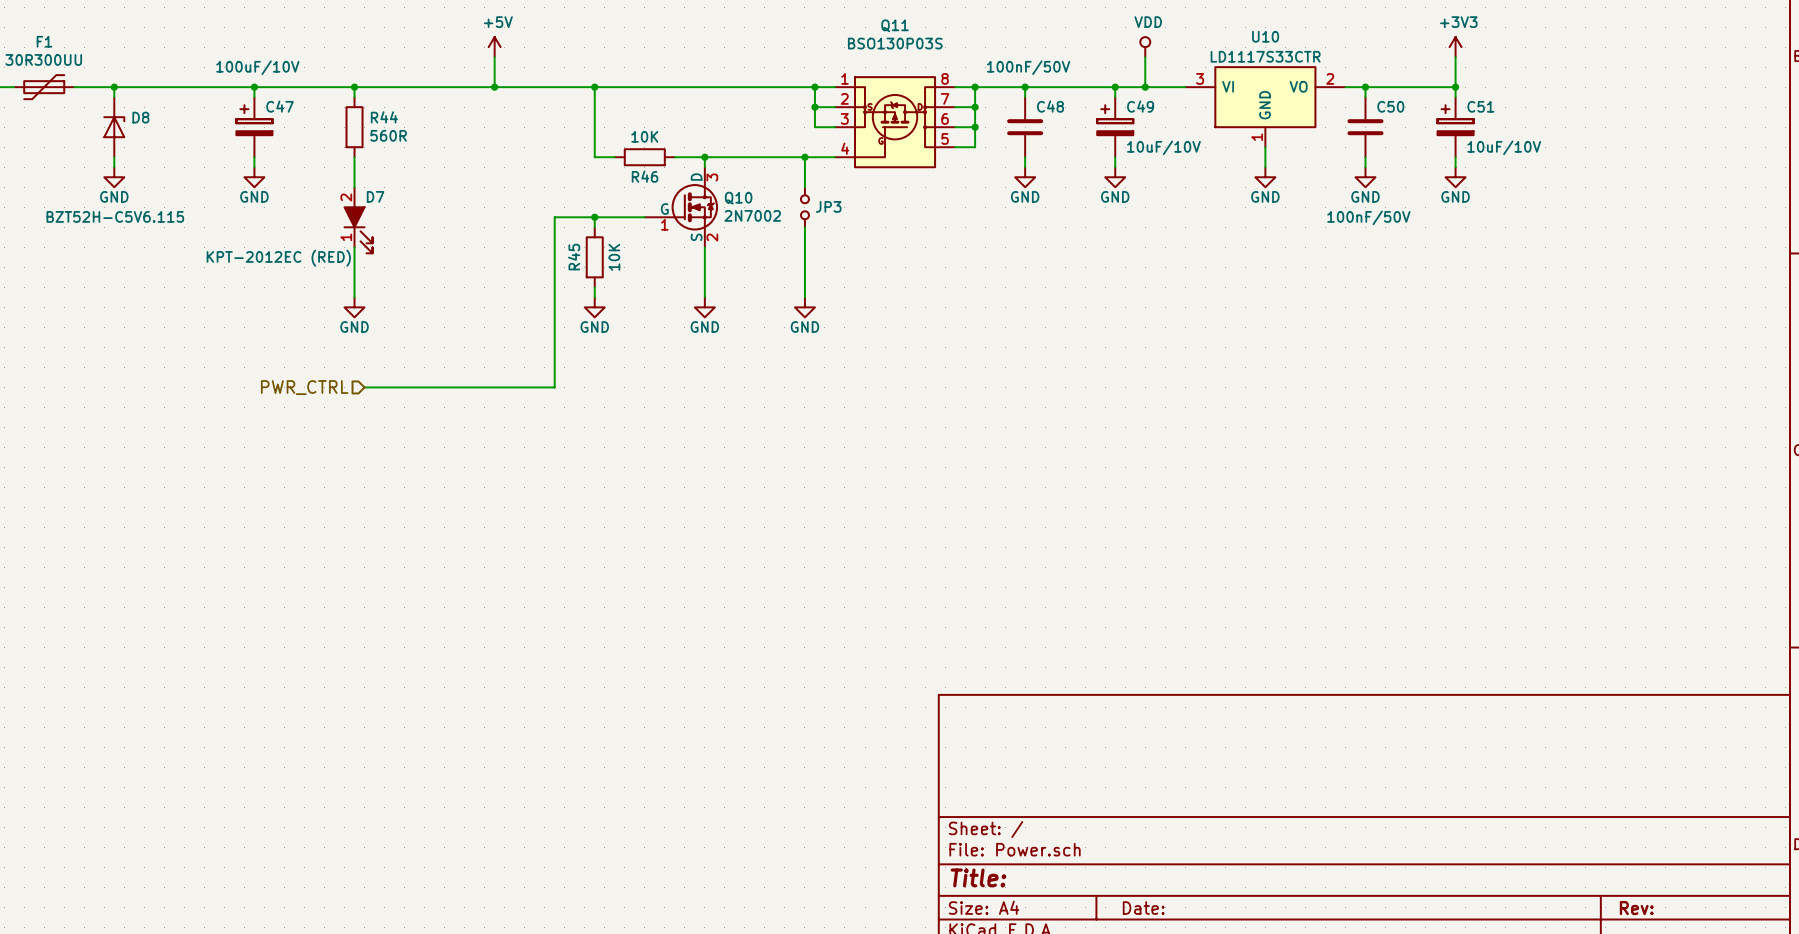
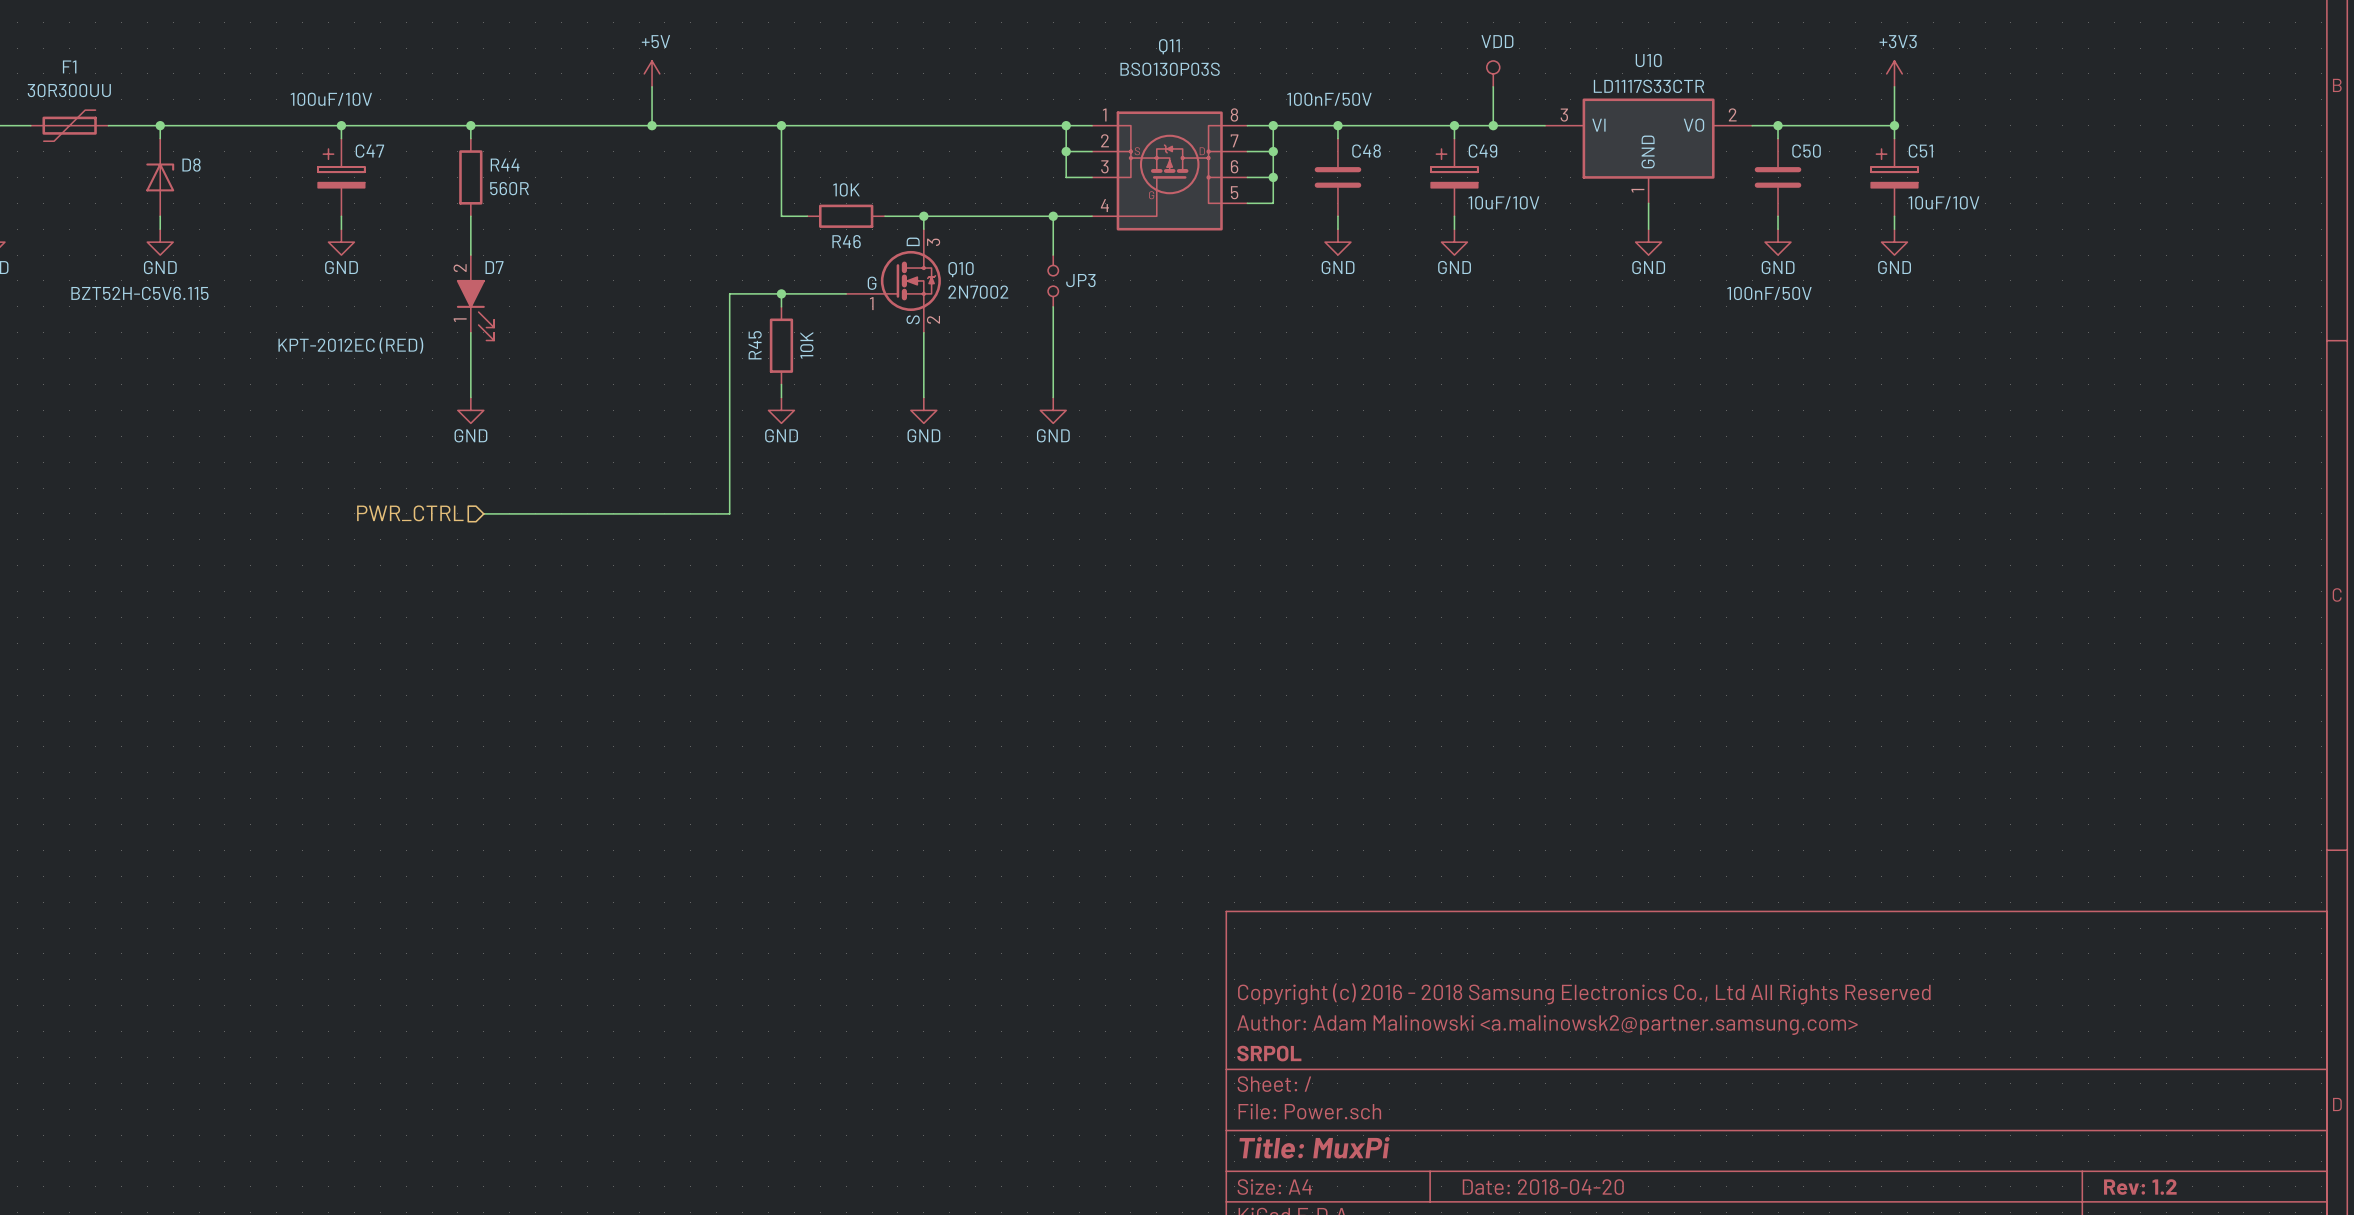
title block: none -> Copyright (c) 2016 - 2018 Samsung Electronics Co., Ltd All Rights Reserved (1584, 993)
title block: none -> Author: Adam Malinowski <a.malinowsk2@partner.samsung.com> (1547, 1025)
title block: none -> SRPOL (1269, 1053)
title block: Title: (978, 877) -> Title: MuxPi (1314, 1147)
title block: Date: (1143, 908) -> Date: 2018-04-20 (1543, 1187)
title block: Rev: (1636, 908) -> Rev: 1.2 (2140, 1187)

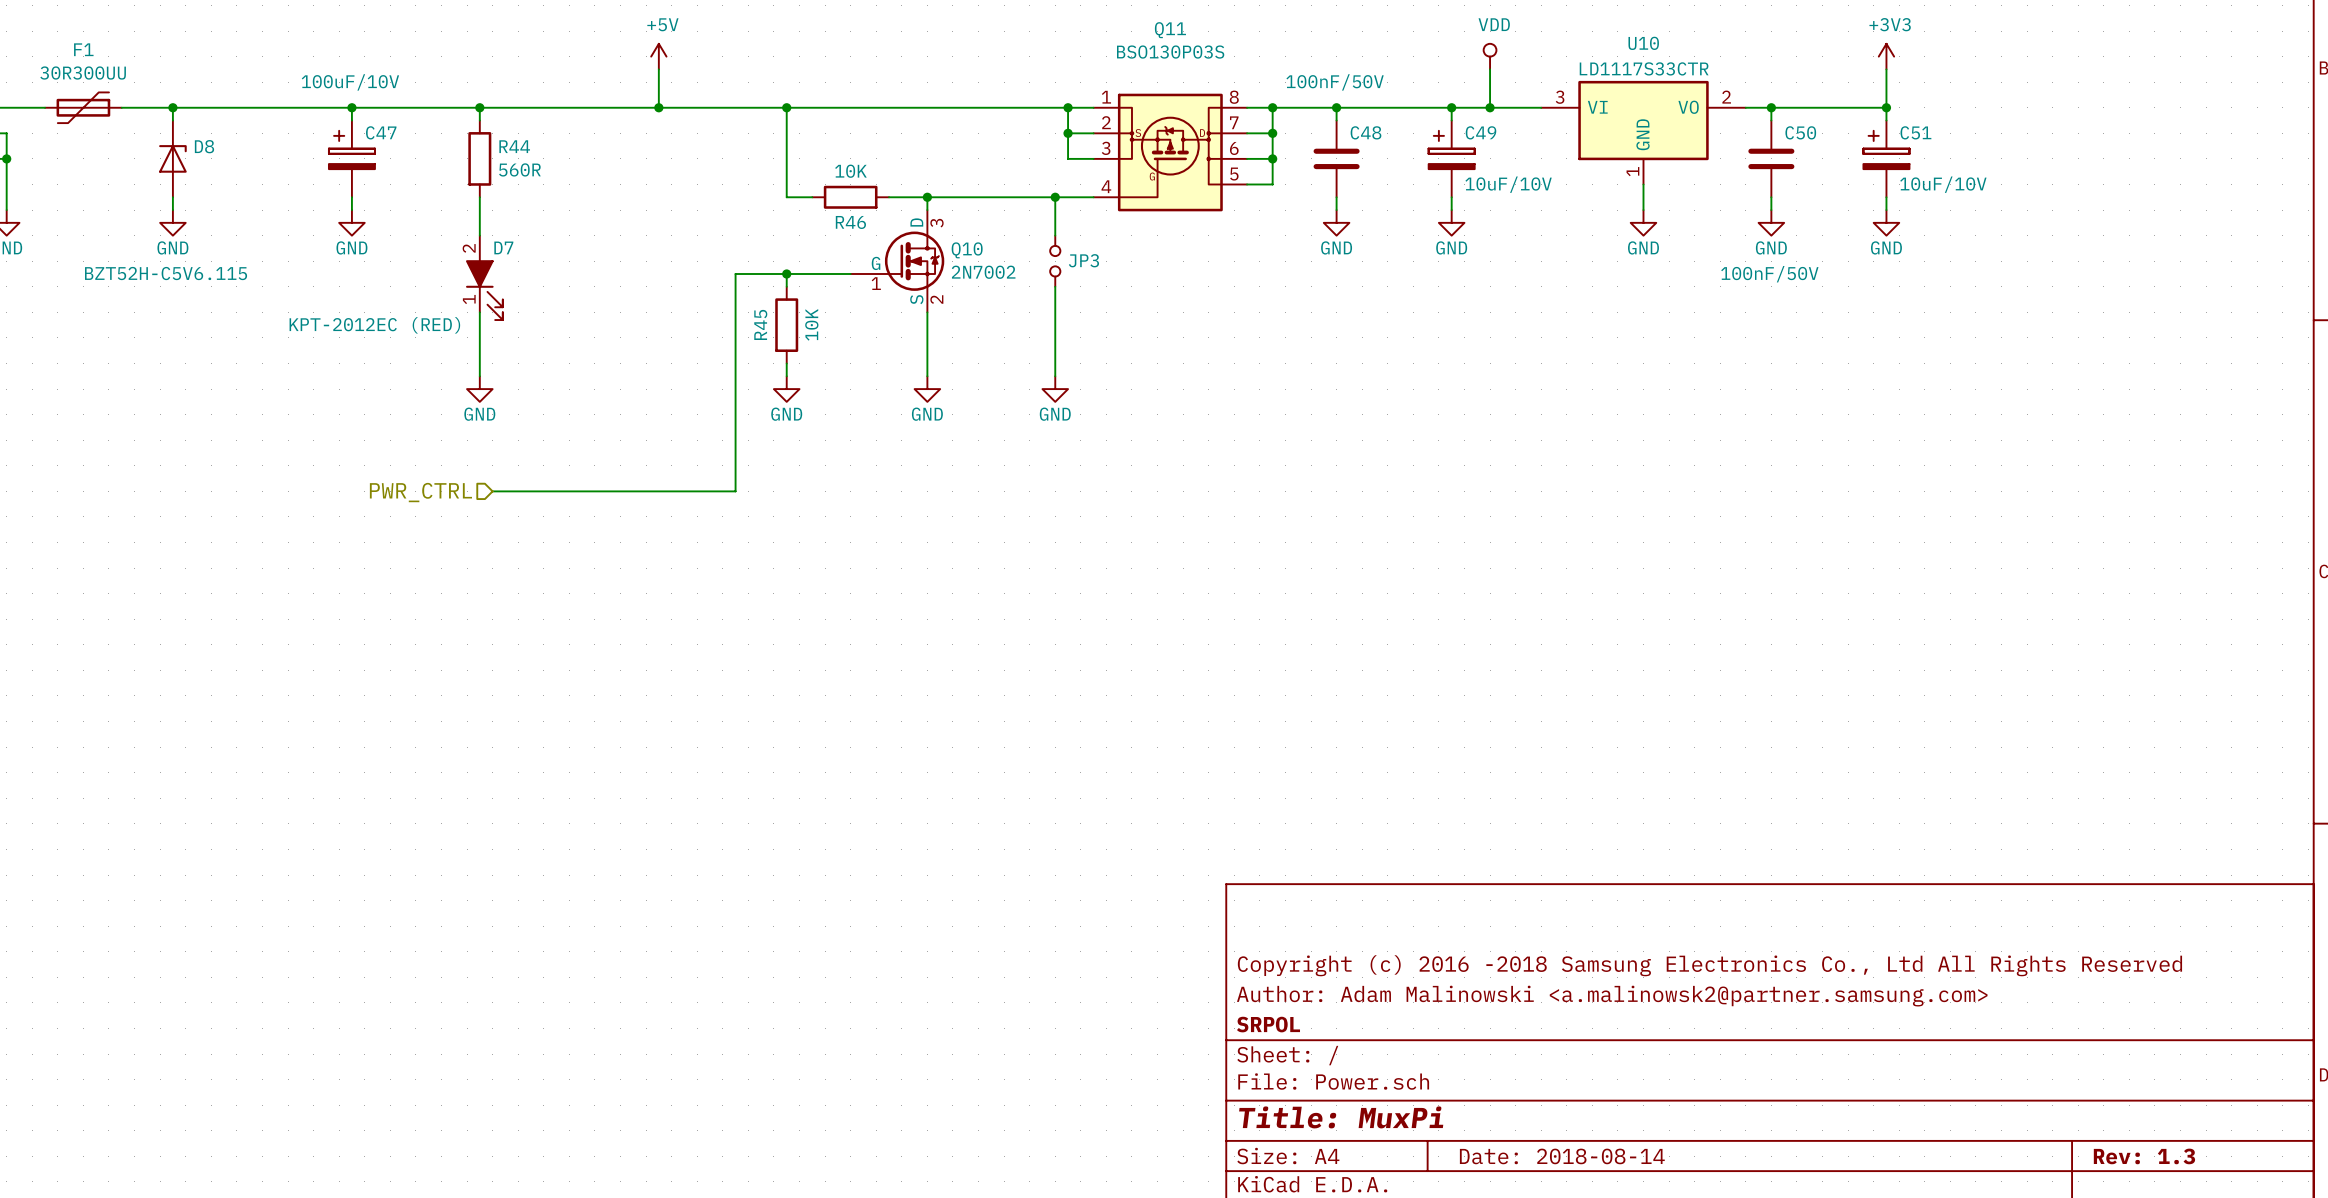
title block: Copyright (c) 2016 - 2018 Samsung Electronics Co., Ltd All Rights Reserved (1584, 993) -> Copyright (c) 2016 -2018 Samsung Electronics Co., Ltd All Rights Reserved (1709, 965)
title block: Date: 2018-04-20 (1543, 1187) -> Date: 2018-08-14 (1562, 1156)
title block: Rev: 1.2 (2140, 1187) -> Rev: 1.3 (2144, 1156)

